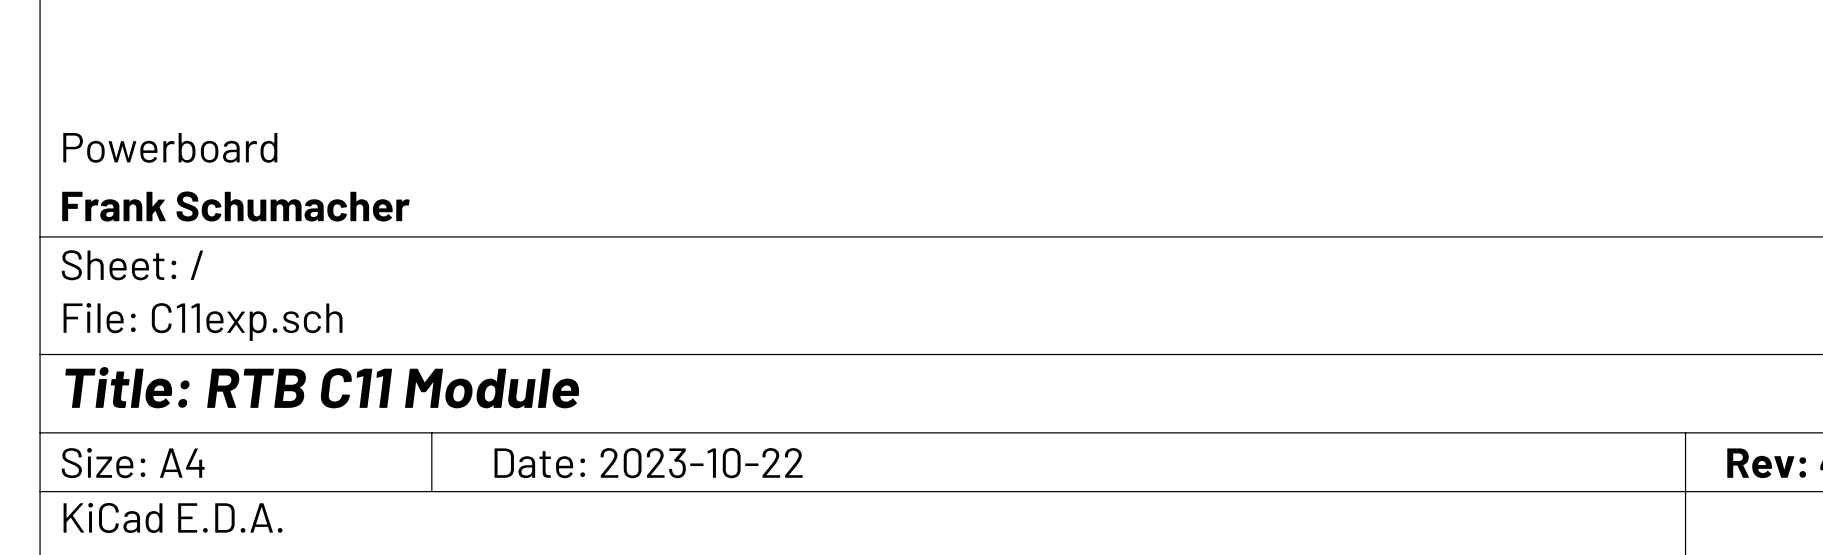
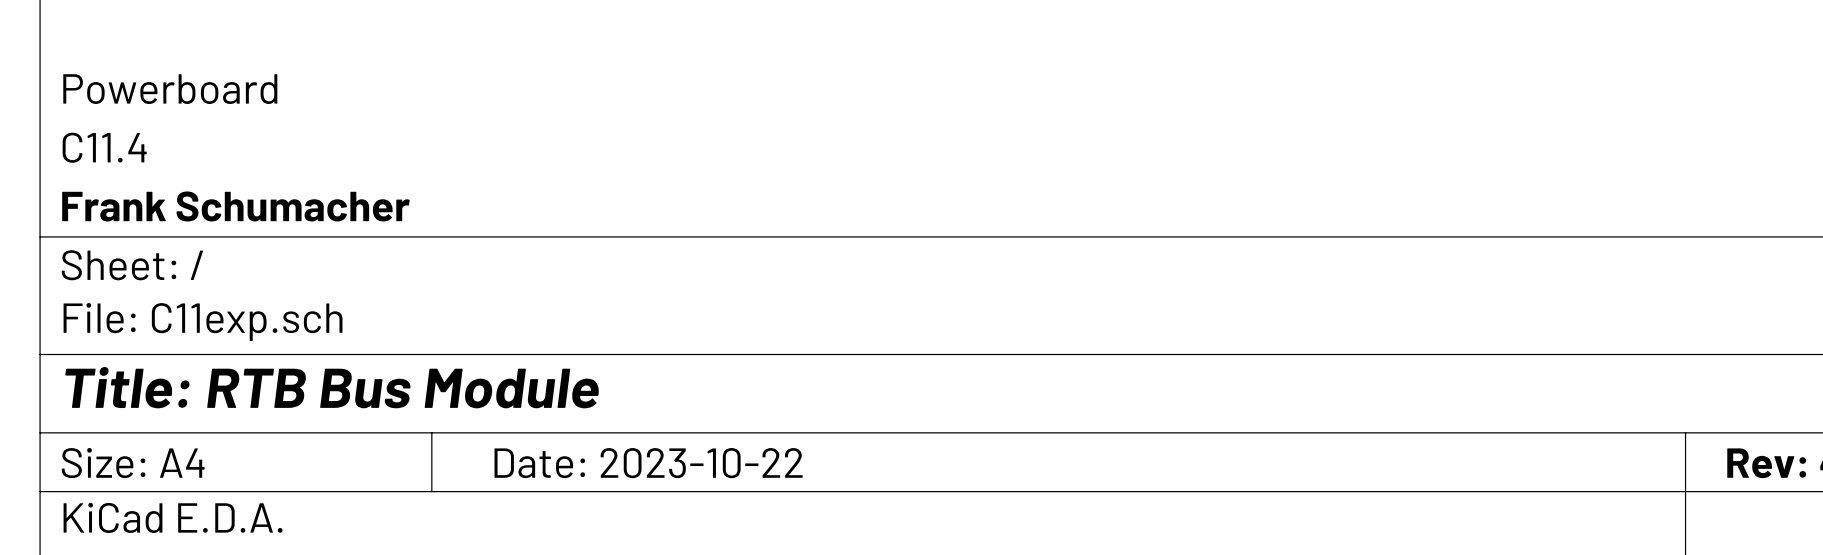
title block: none -> Powerboard (170, 89)
title block: Powerboard (170, 147) -> C11.4 (104, 147)
title block: Title: RTB C11 Module (322, 387) -> Title: RTB Bus Module (332, 387)

